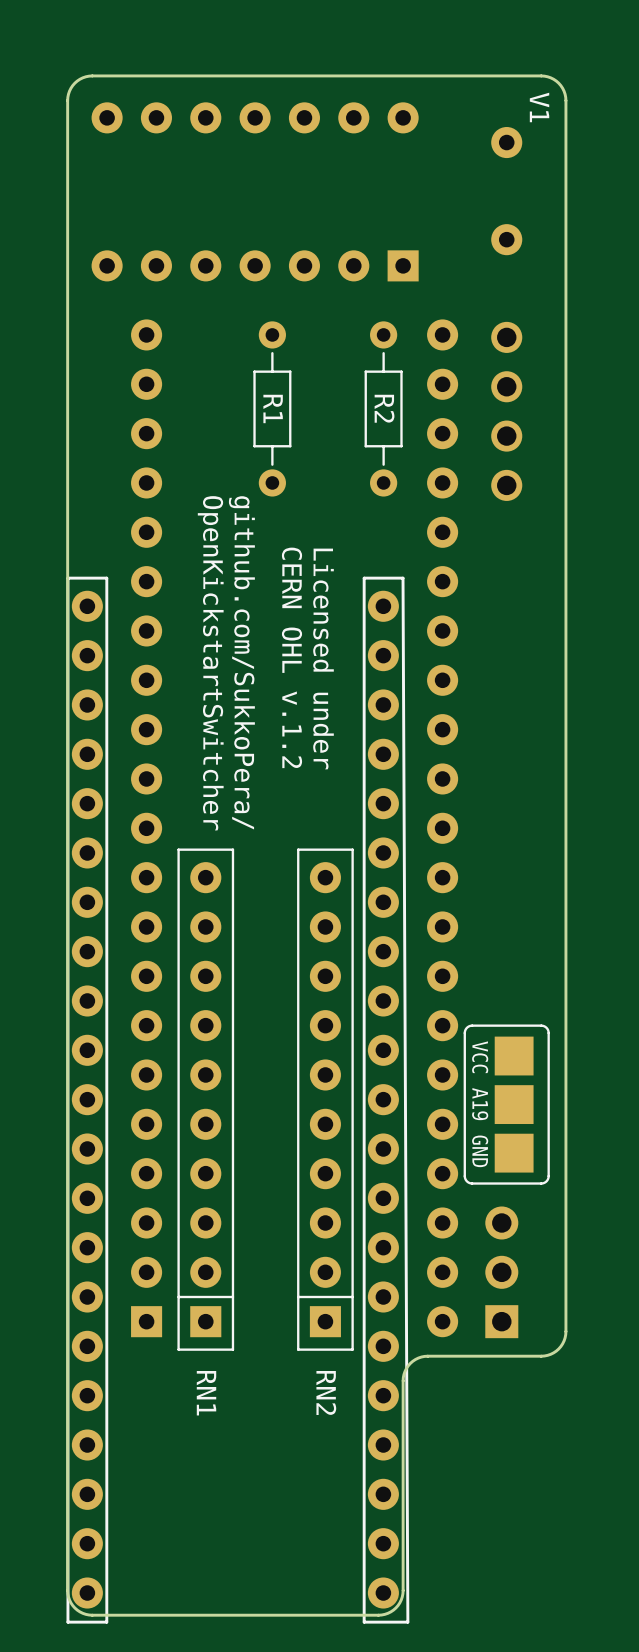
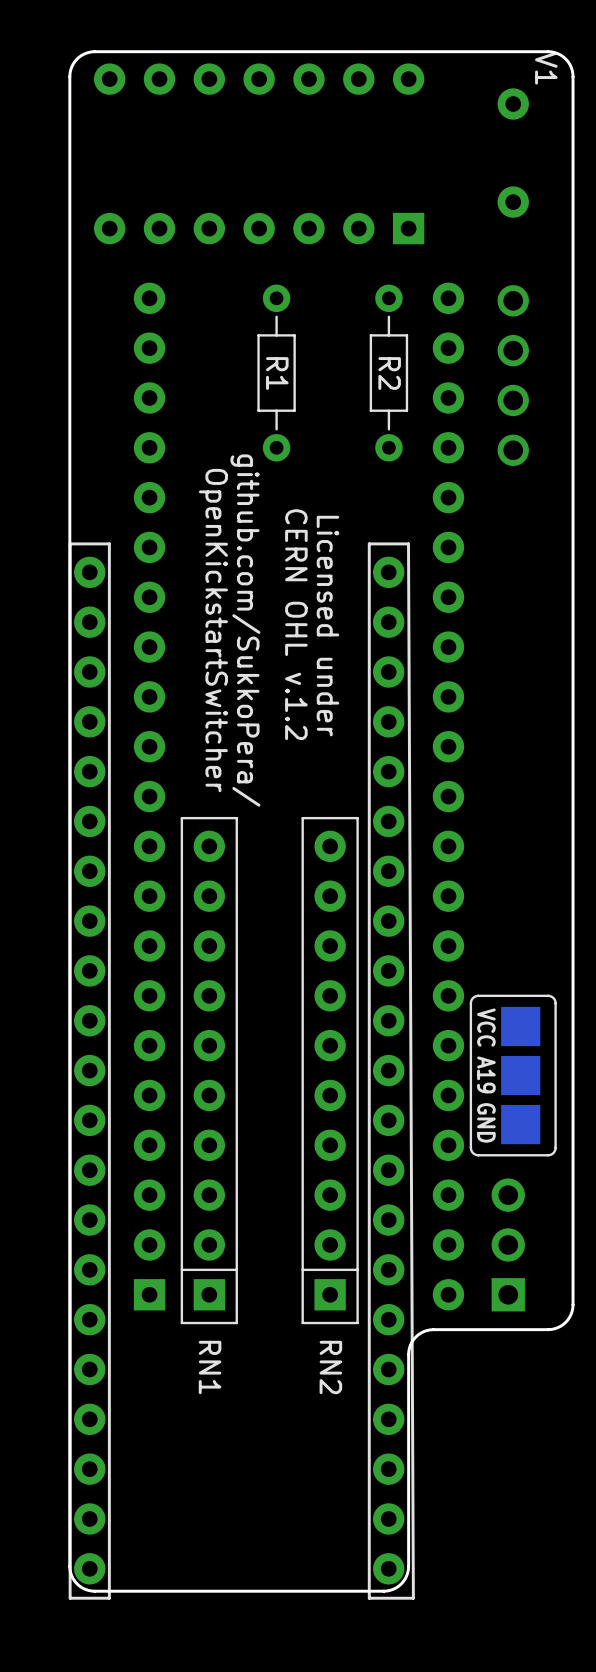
board edge: (565, 115) (565, 97) (562, 88) (553, 79) (541, 75) (89, 76) (79, 79) (70, 88) (67, 97) (67, 115) -> (573, 76) (571, 67) (565, 58) (557, 53) (548, 51) (94, 51) (85, 53) (77, 58) (71, 67) (69, 76)

